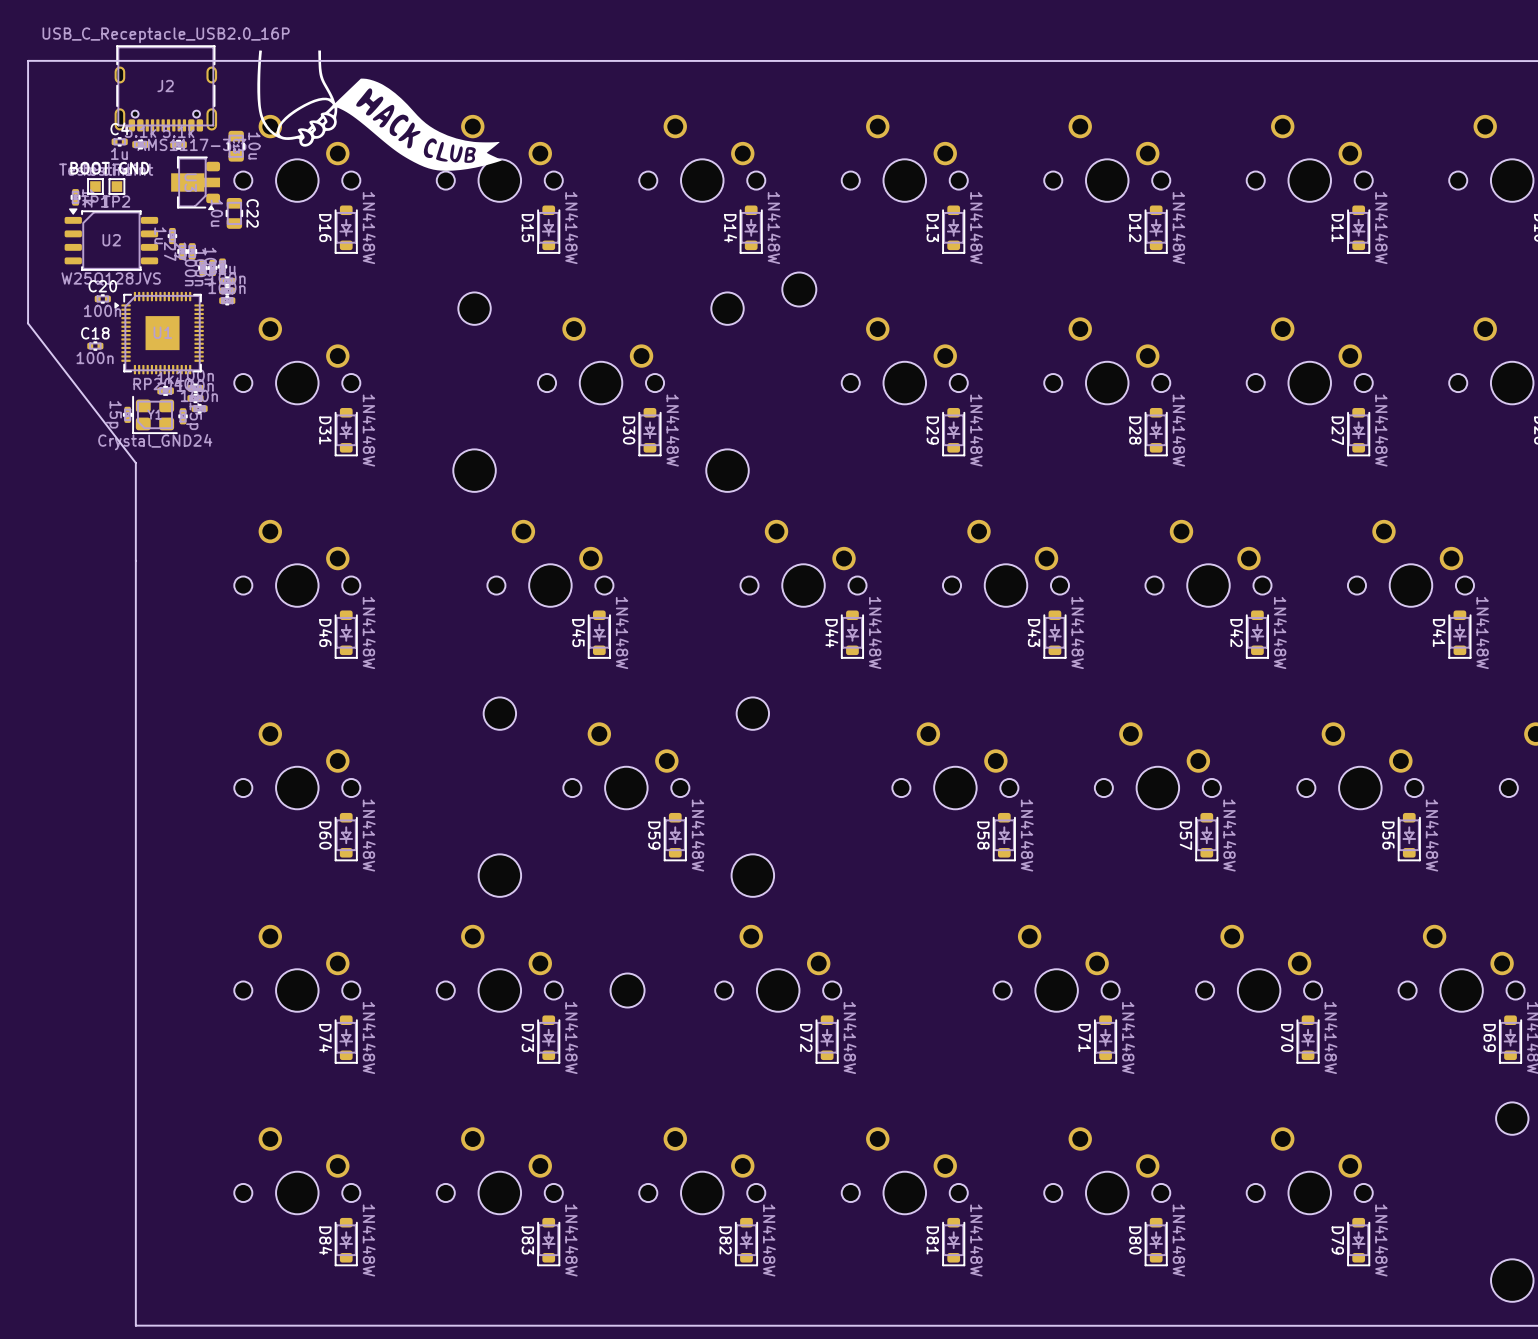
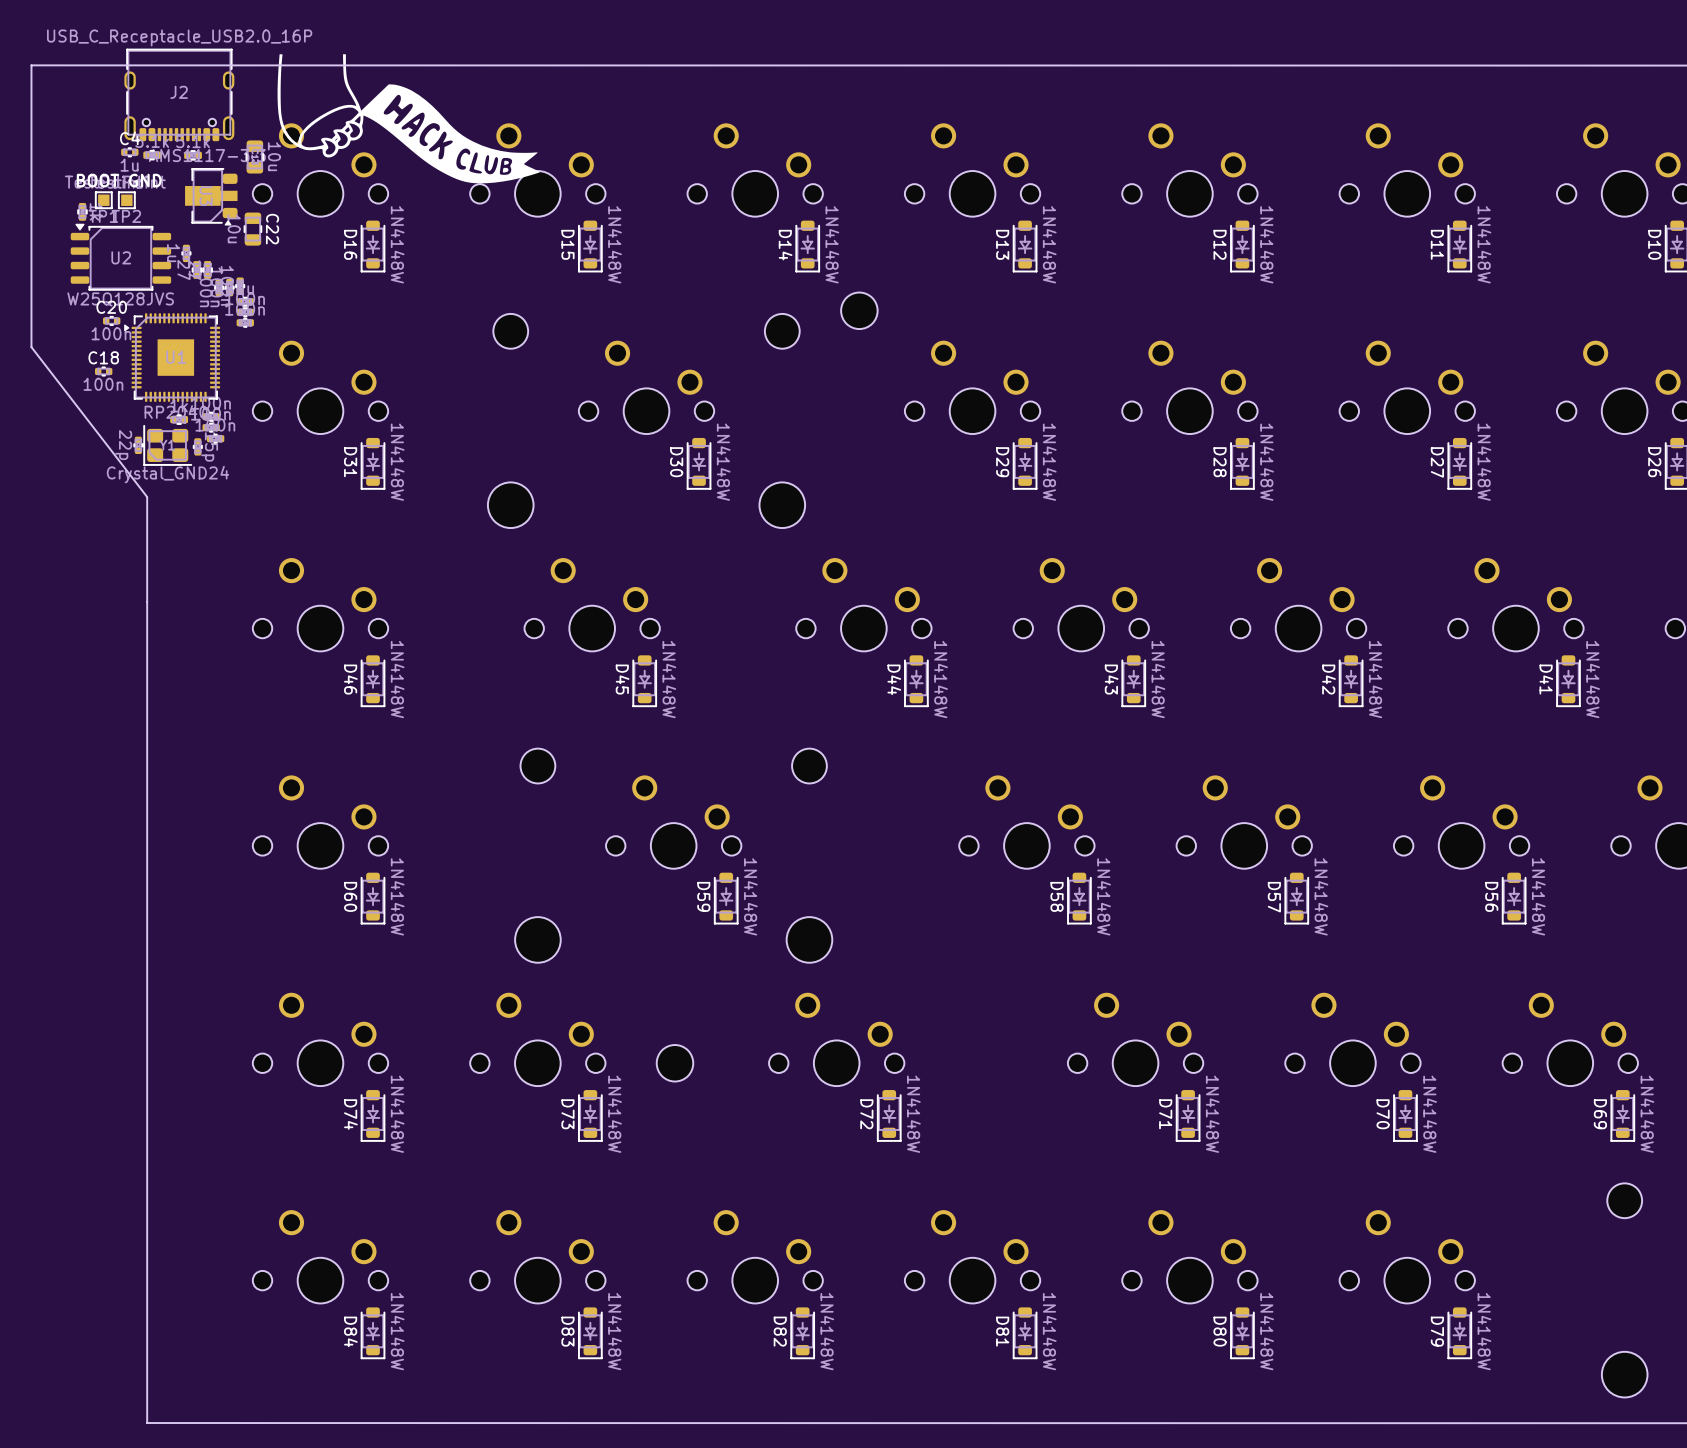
part value: 15p (113, 414) -> 22p (123, 445)

